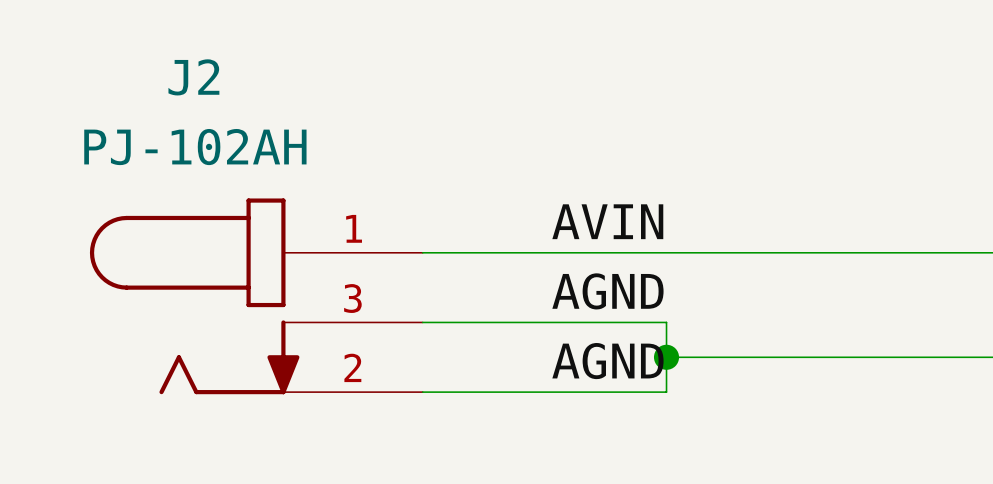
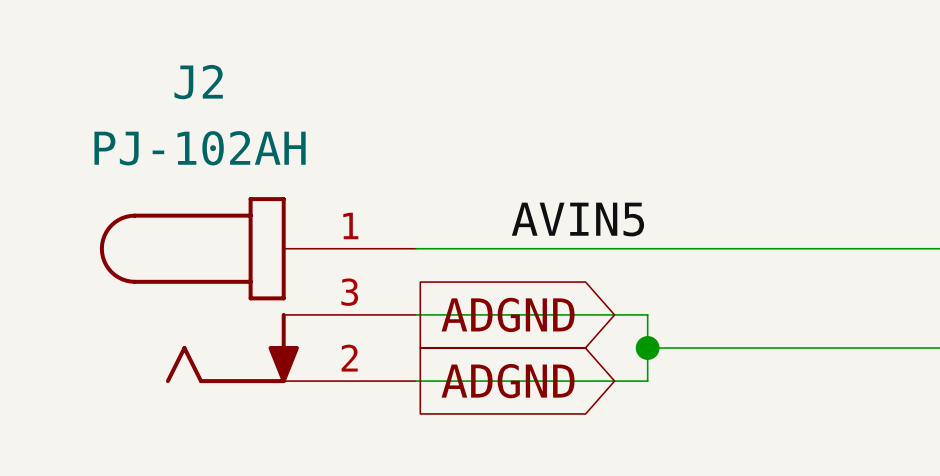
label: AVIN (607, 221) -> AVIN5 (577, 219)
label: AGND (607, 291) -> none
global label: none -> ADGND (508, 314)
label: AGND (607, 361) -> none
global label: none -> ADGND (508, 381)

